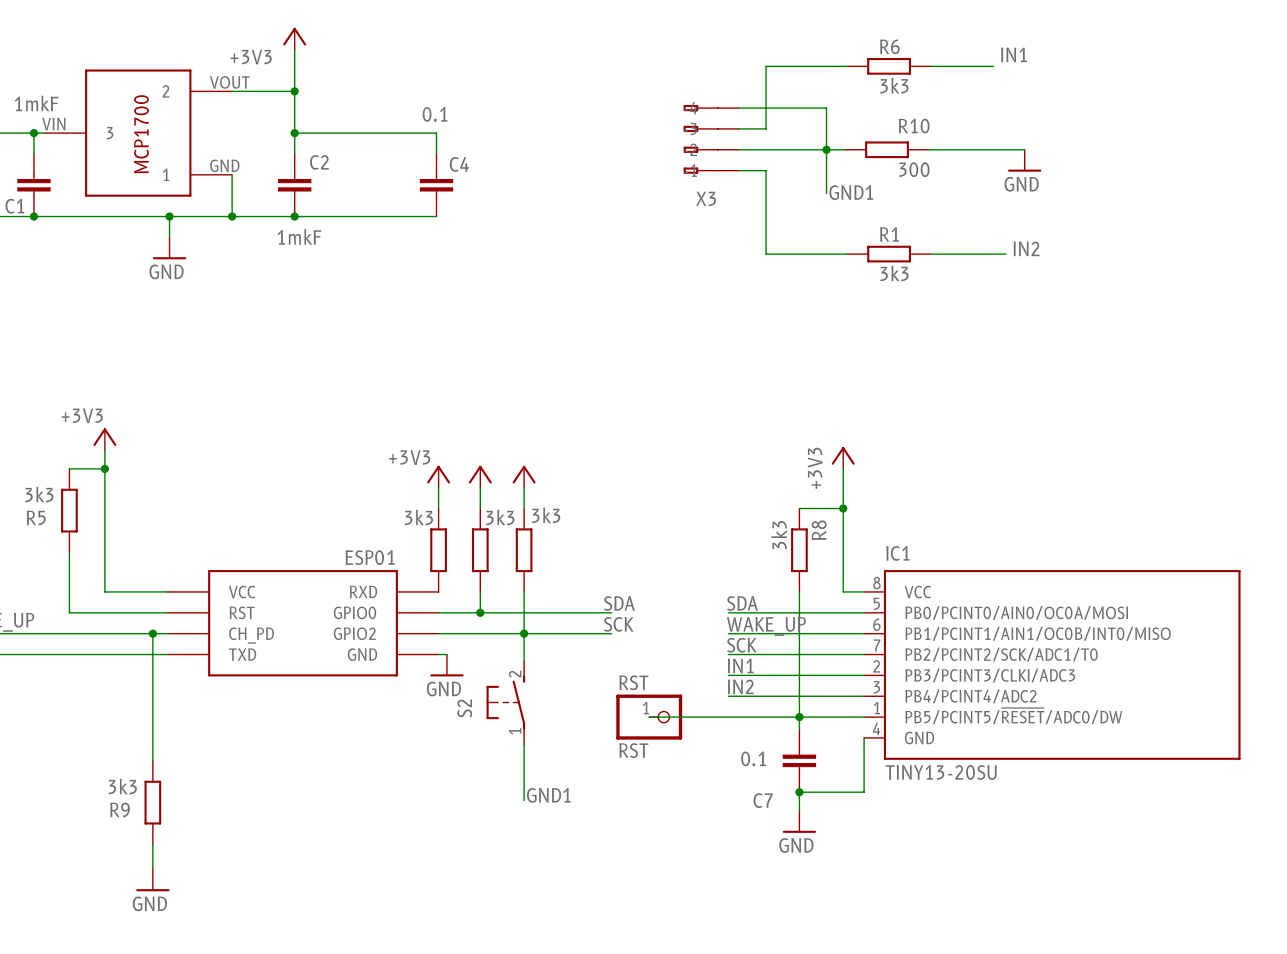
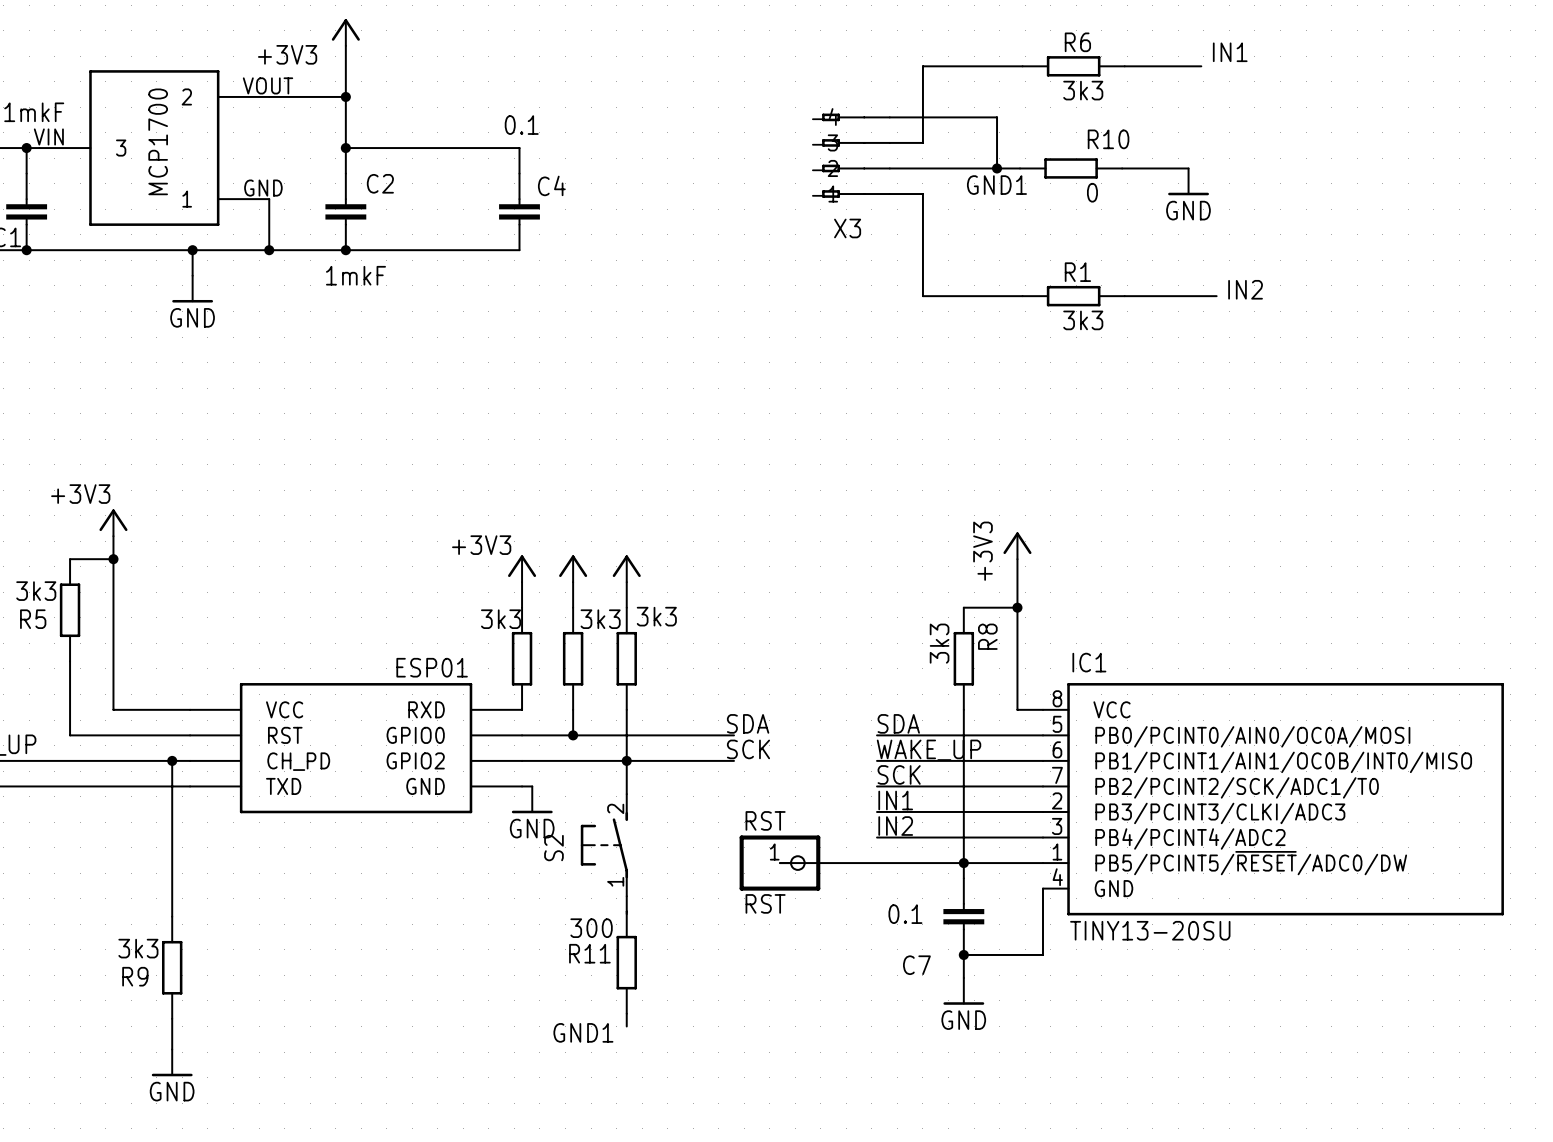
wire: (826, 149) (826, 193) -> none
wire: (982, 149) (1024, 149) -> none
power symbol position: GND (1024, 160) -> GND (1188, 181)
R10 value: 300 (914, 169) -> 0 (1092, 192)
label position: GND1 (851, 192) -> GND1 (996, 185)
wire: (524, 758) (524, 800) -> none
label position: GND1 (548, 795) -> GND1 (583, 1032)
R11: none -> 300 (626, 962)
wire: none -> (626, 1013) (626, 1026)

